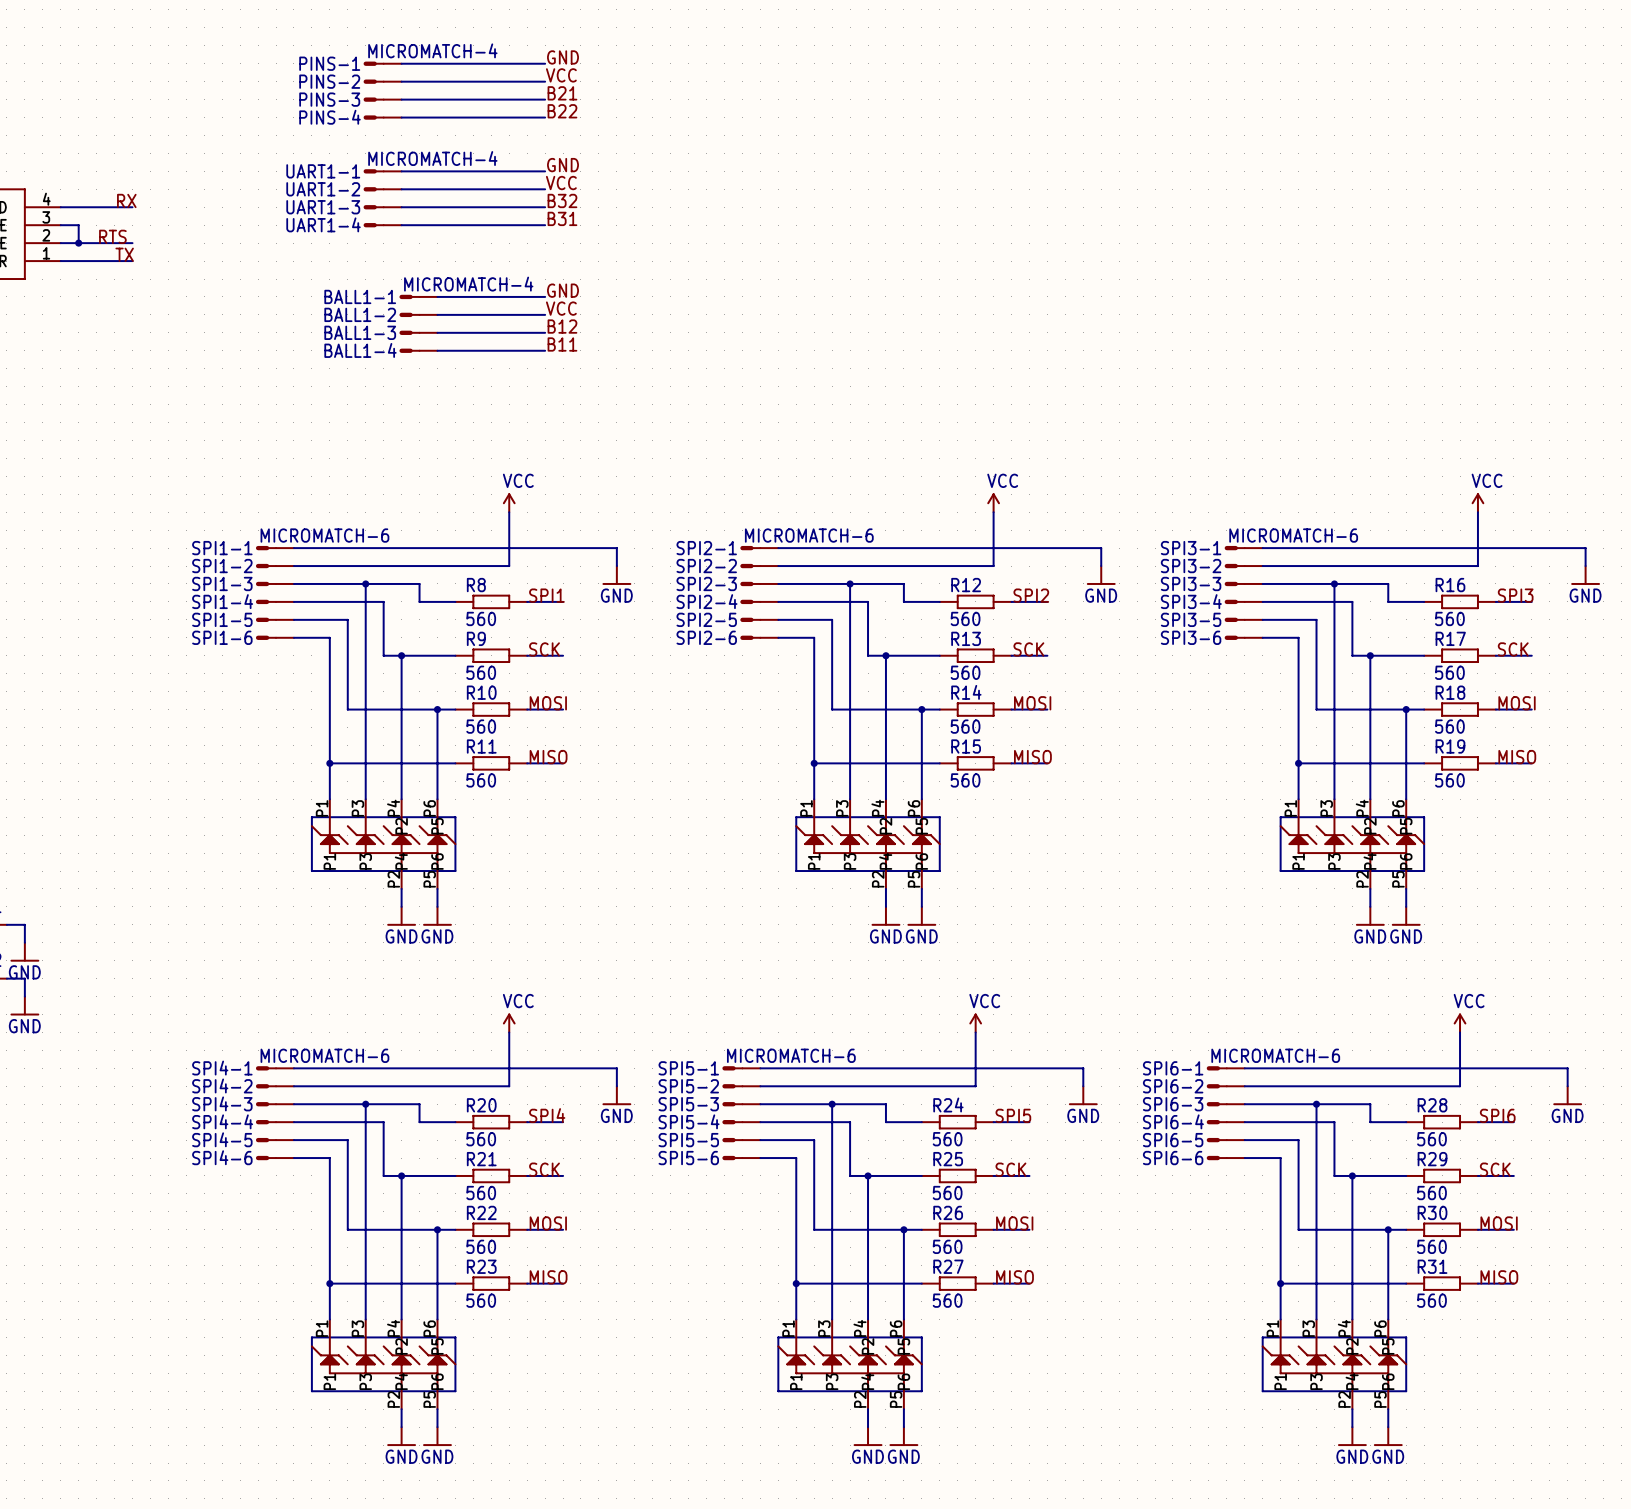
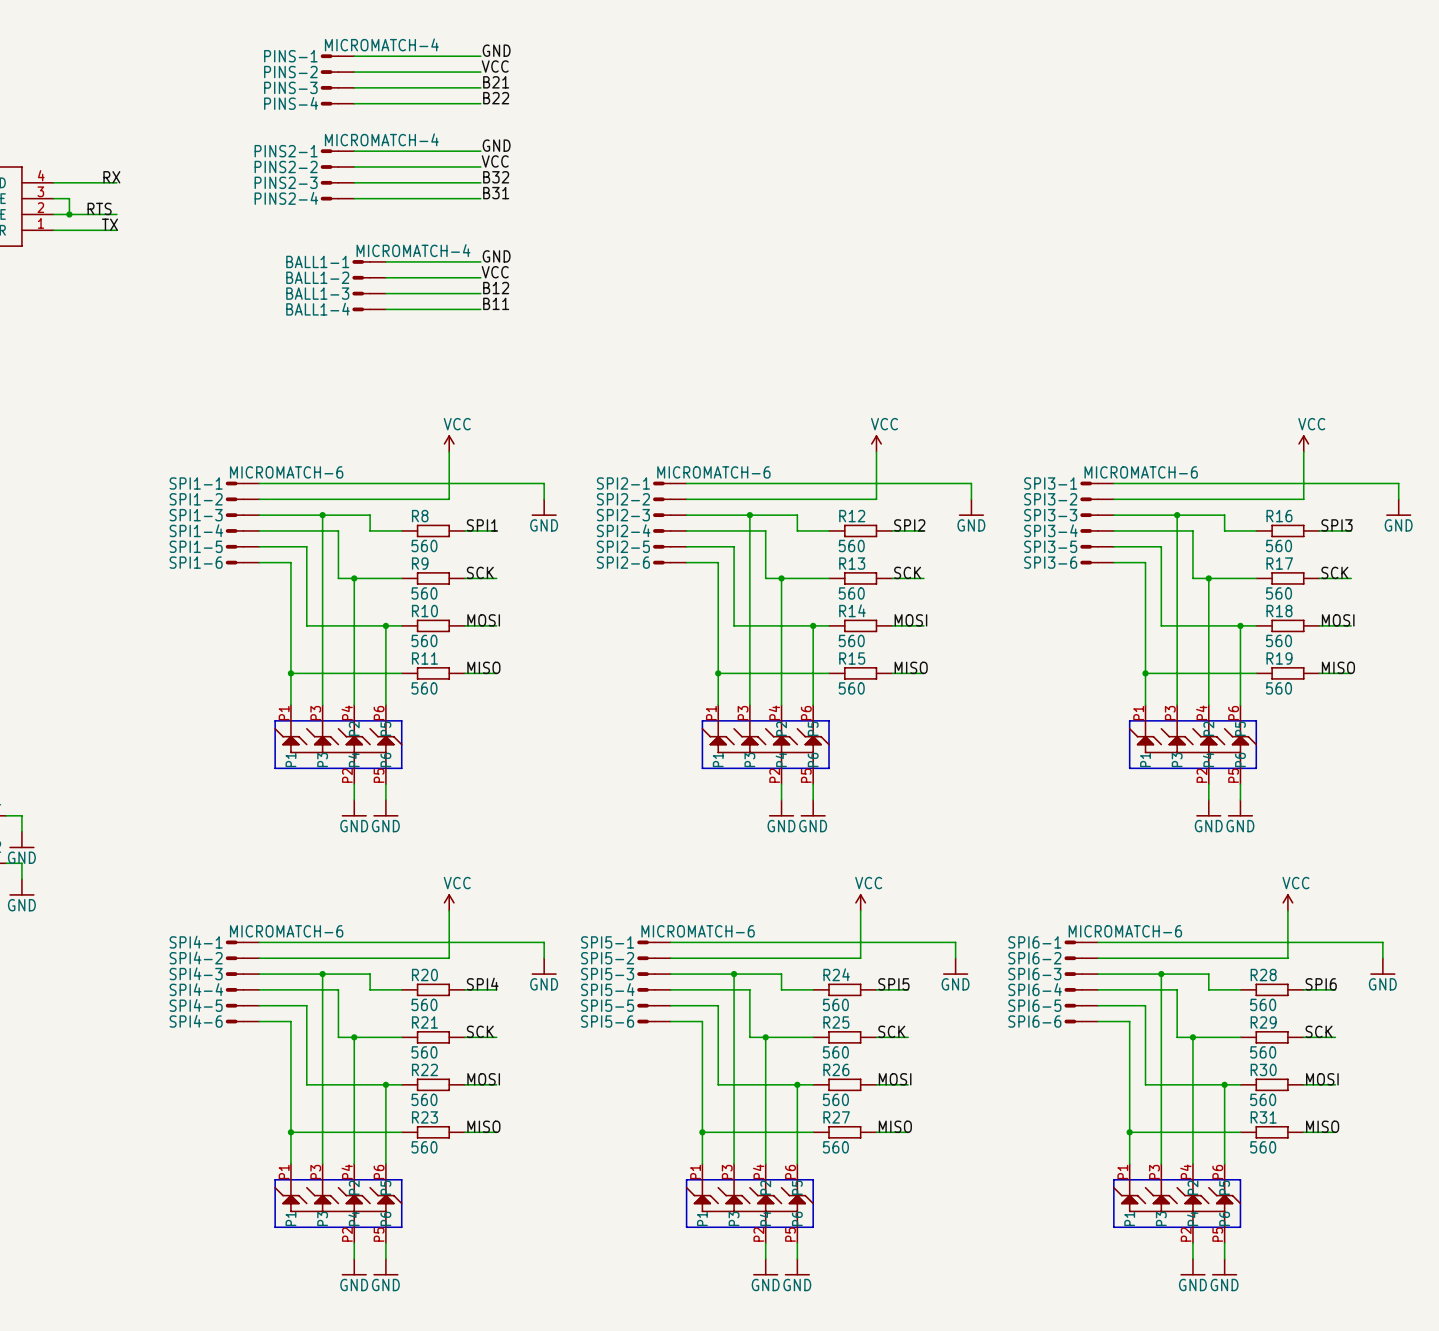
UART1-1 name: UART1-1 (323, 171) -> PINS2-1 (286, 151)
UART1-2 name: UART1-2 (323, 189) -> PINS2-2 (286, 166)
UART1-3 name: UART1-3 (323, 207) -> PINS2-3 (286, 182)
UART1-4 name: UART1-4 (323, 224) -> PINS2-4 (286, 198)

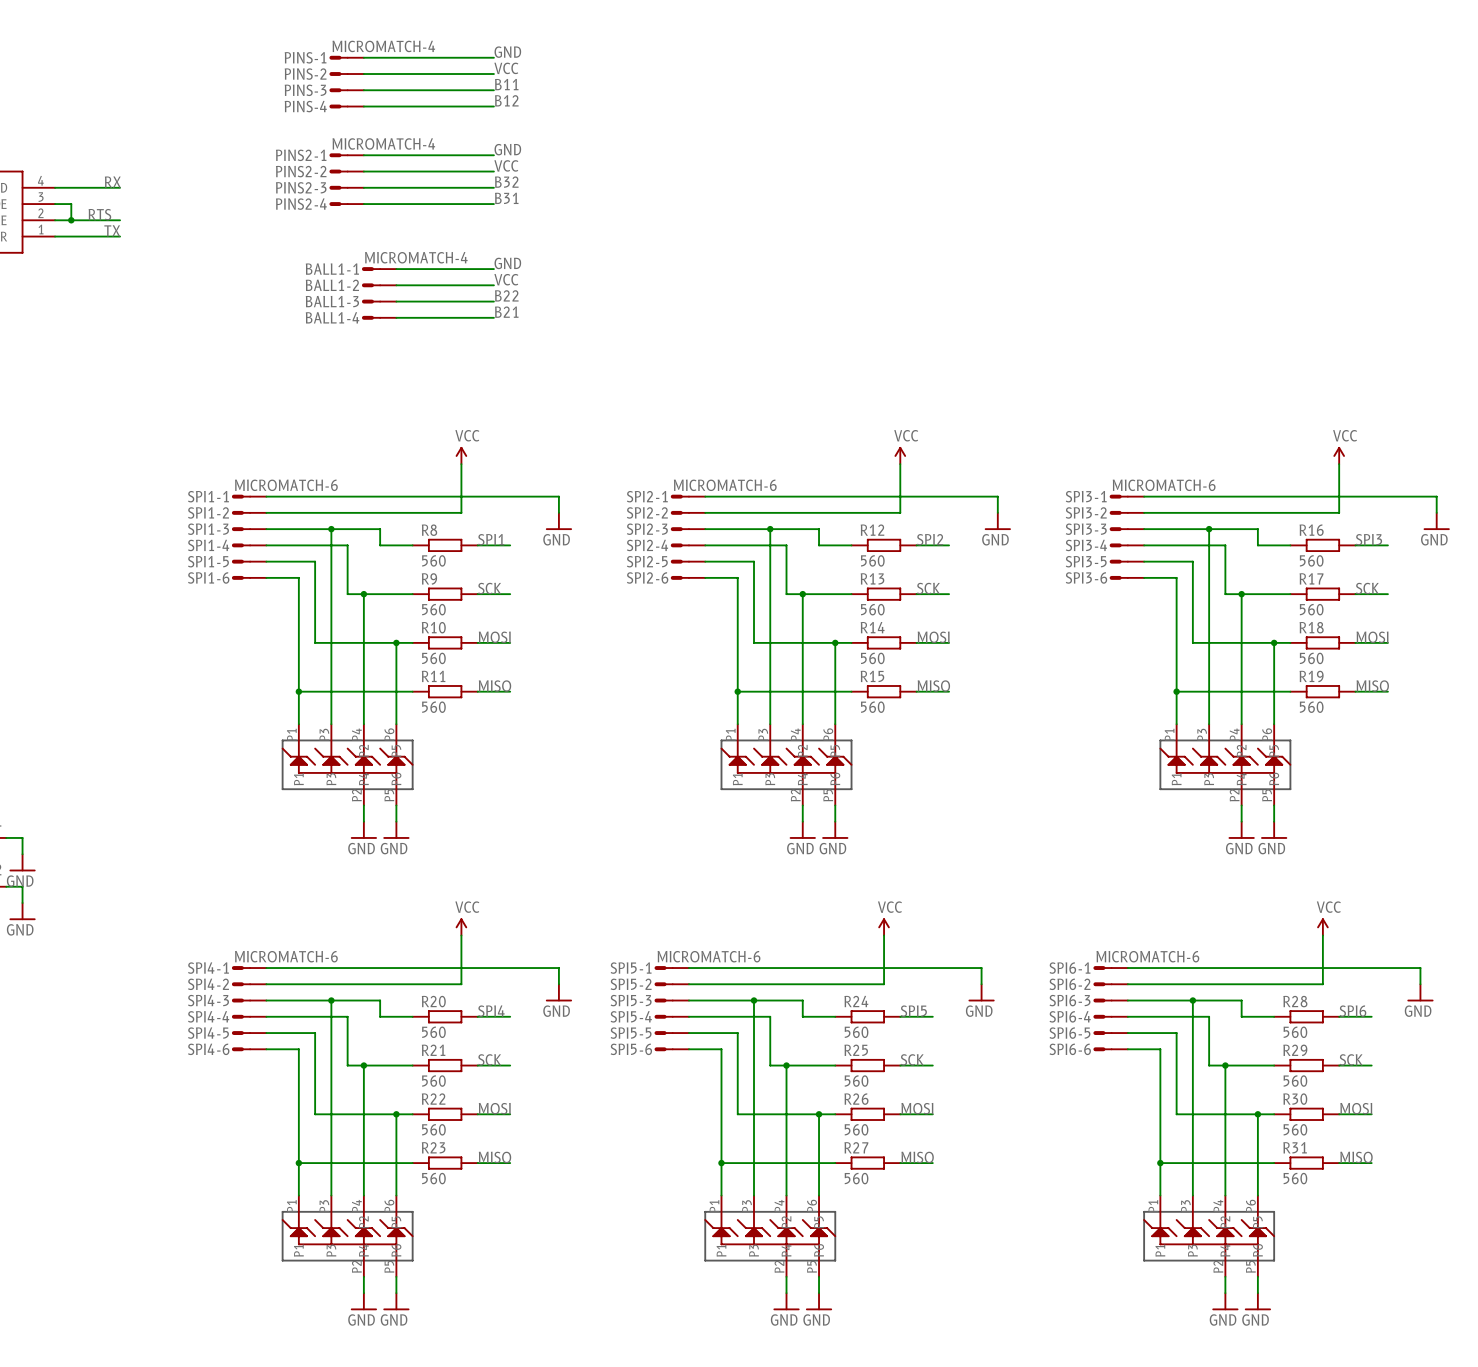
label: B21 (496, 82) -> B11 (506, 84)
label: B22 (496, 98) -> B12 (506, 100)
label: B12 (496, 288) -> B22 (506, 295)
label: B11 (496, 303) -> B21 (506, 312)

